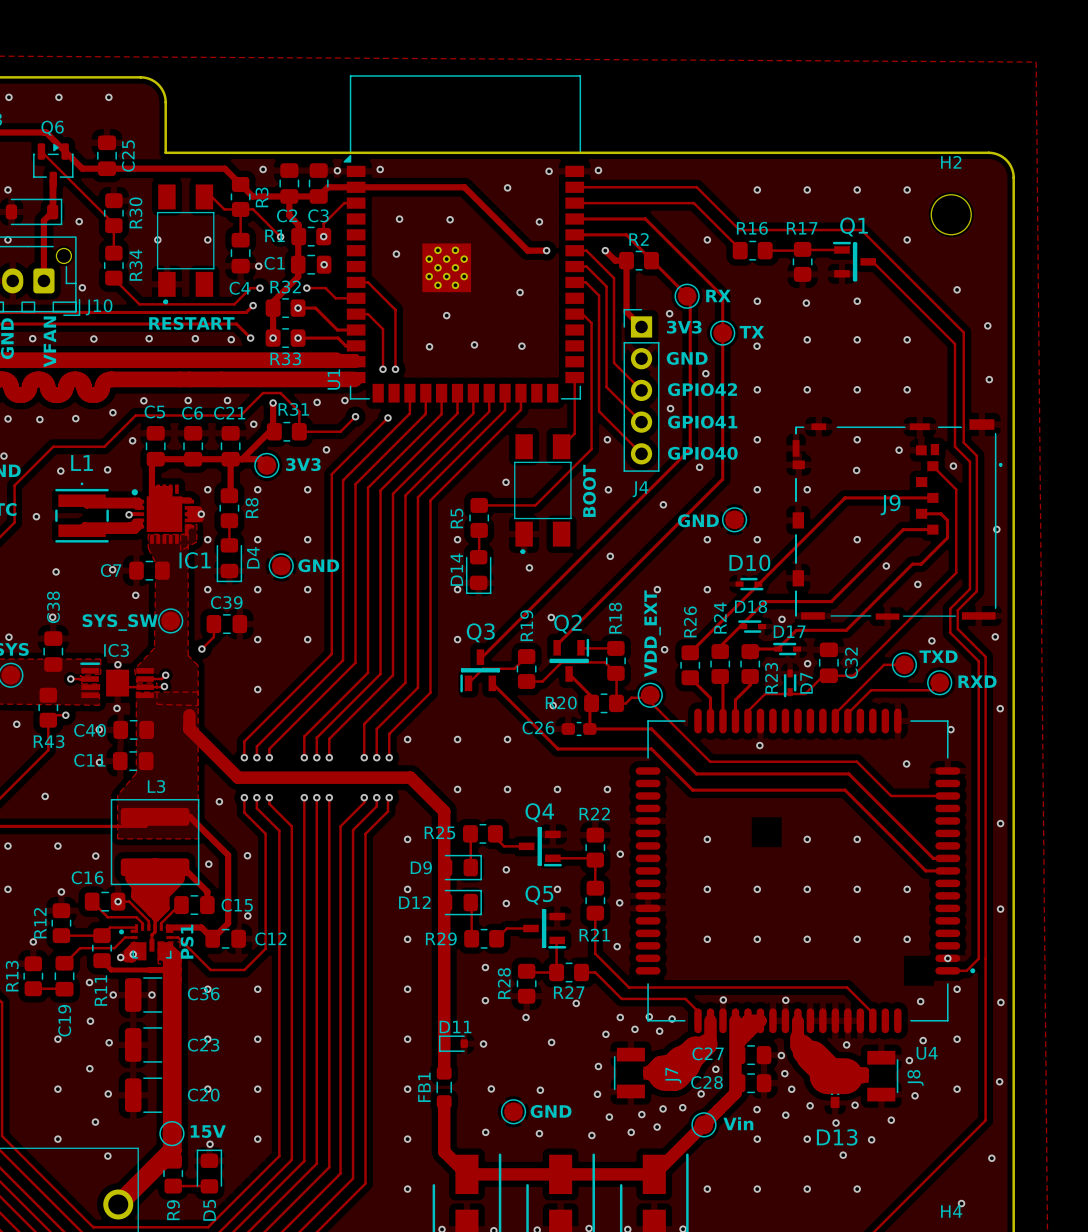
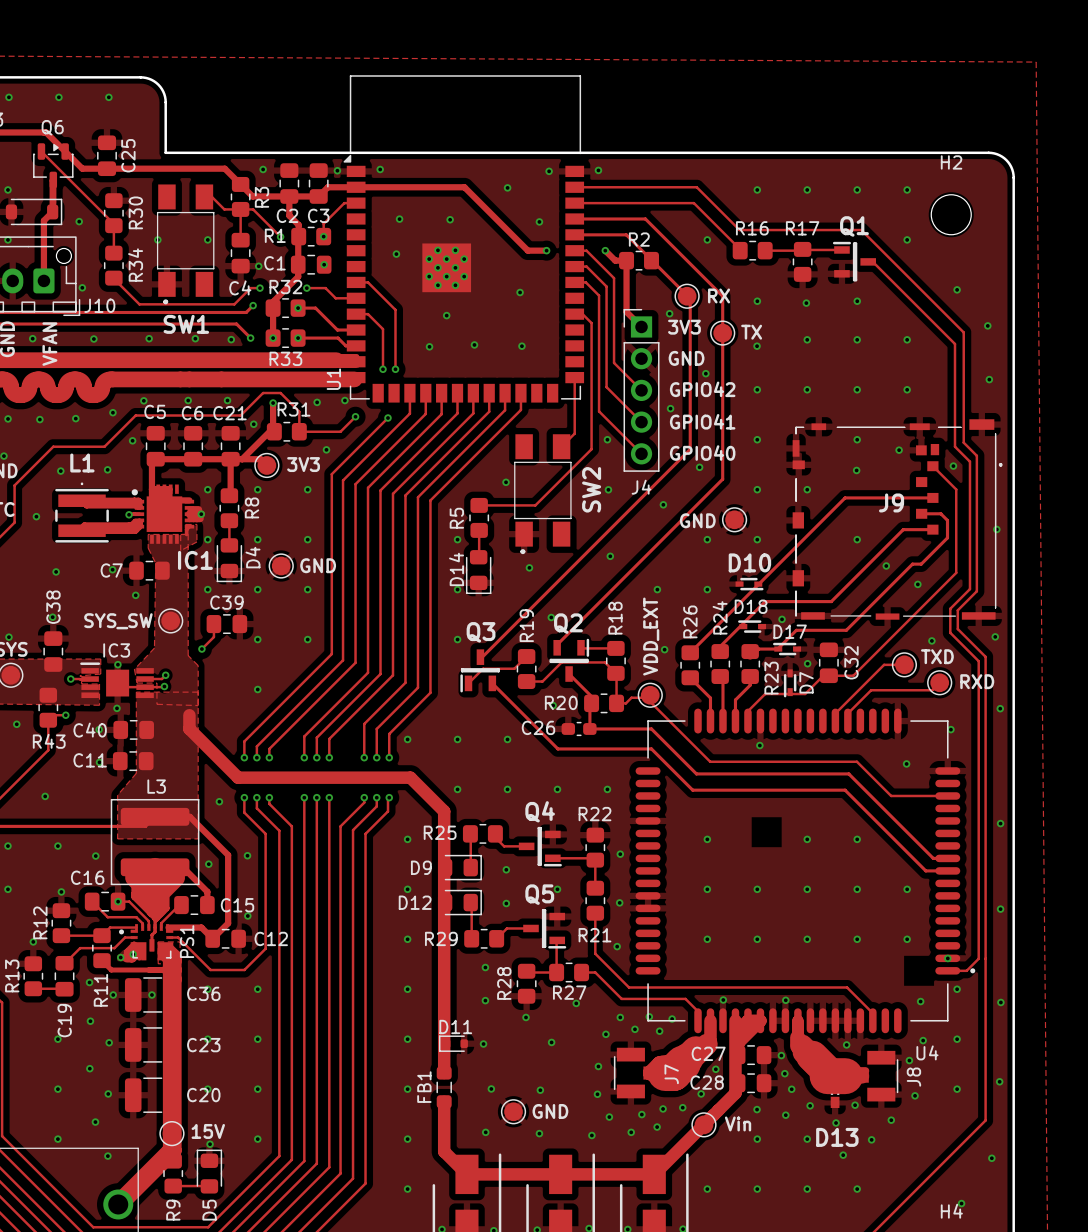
text: RESTART (191, 323) -> none
SW1 name: none -> SW1 (186, 324)
text: BOOT (589, 490) -> none
SW2 name: none -> SW2 (591, 489)

